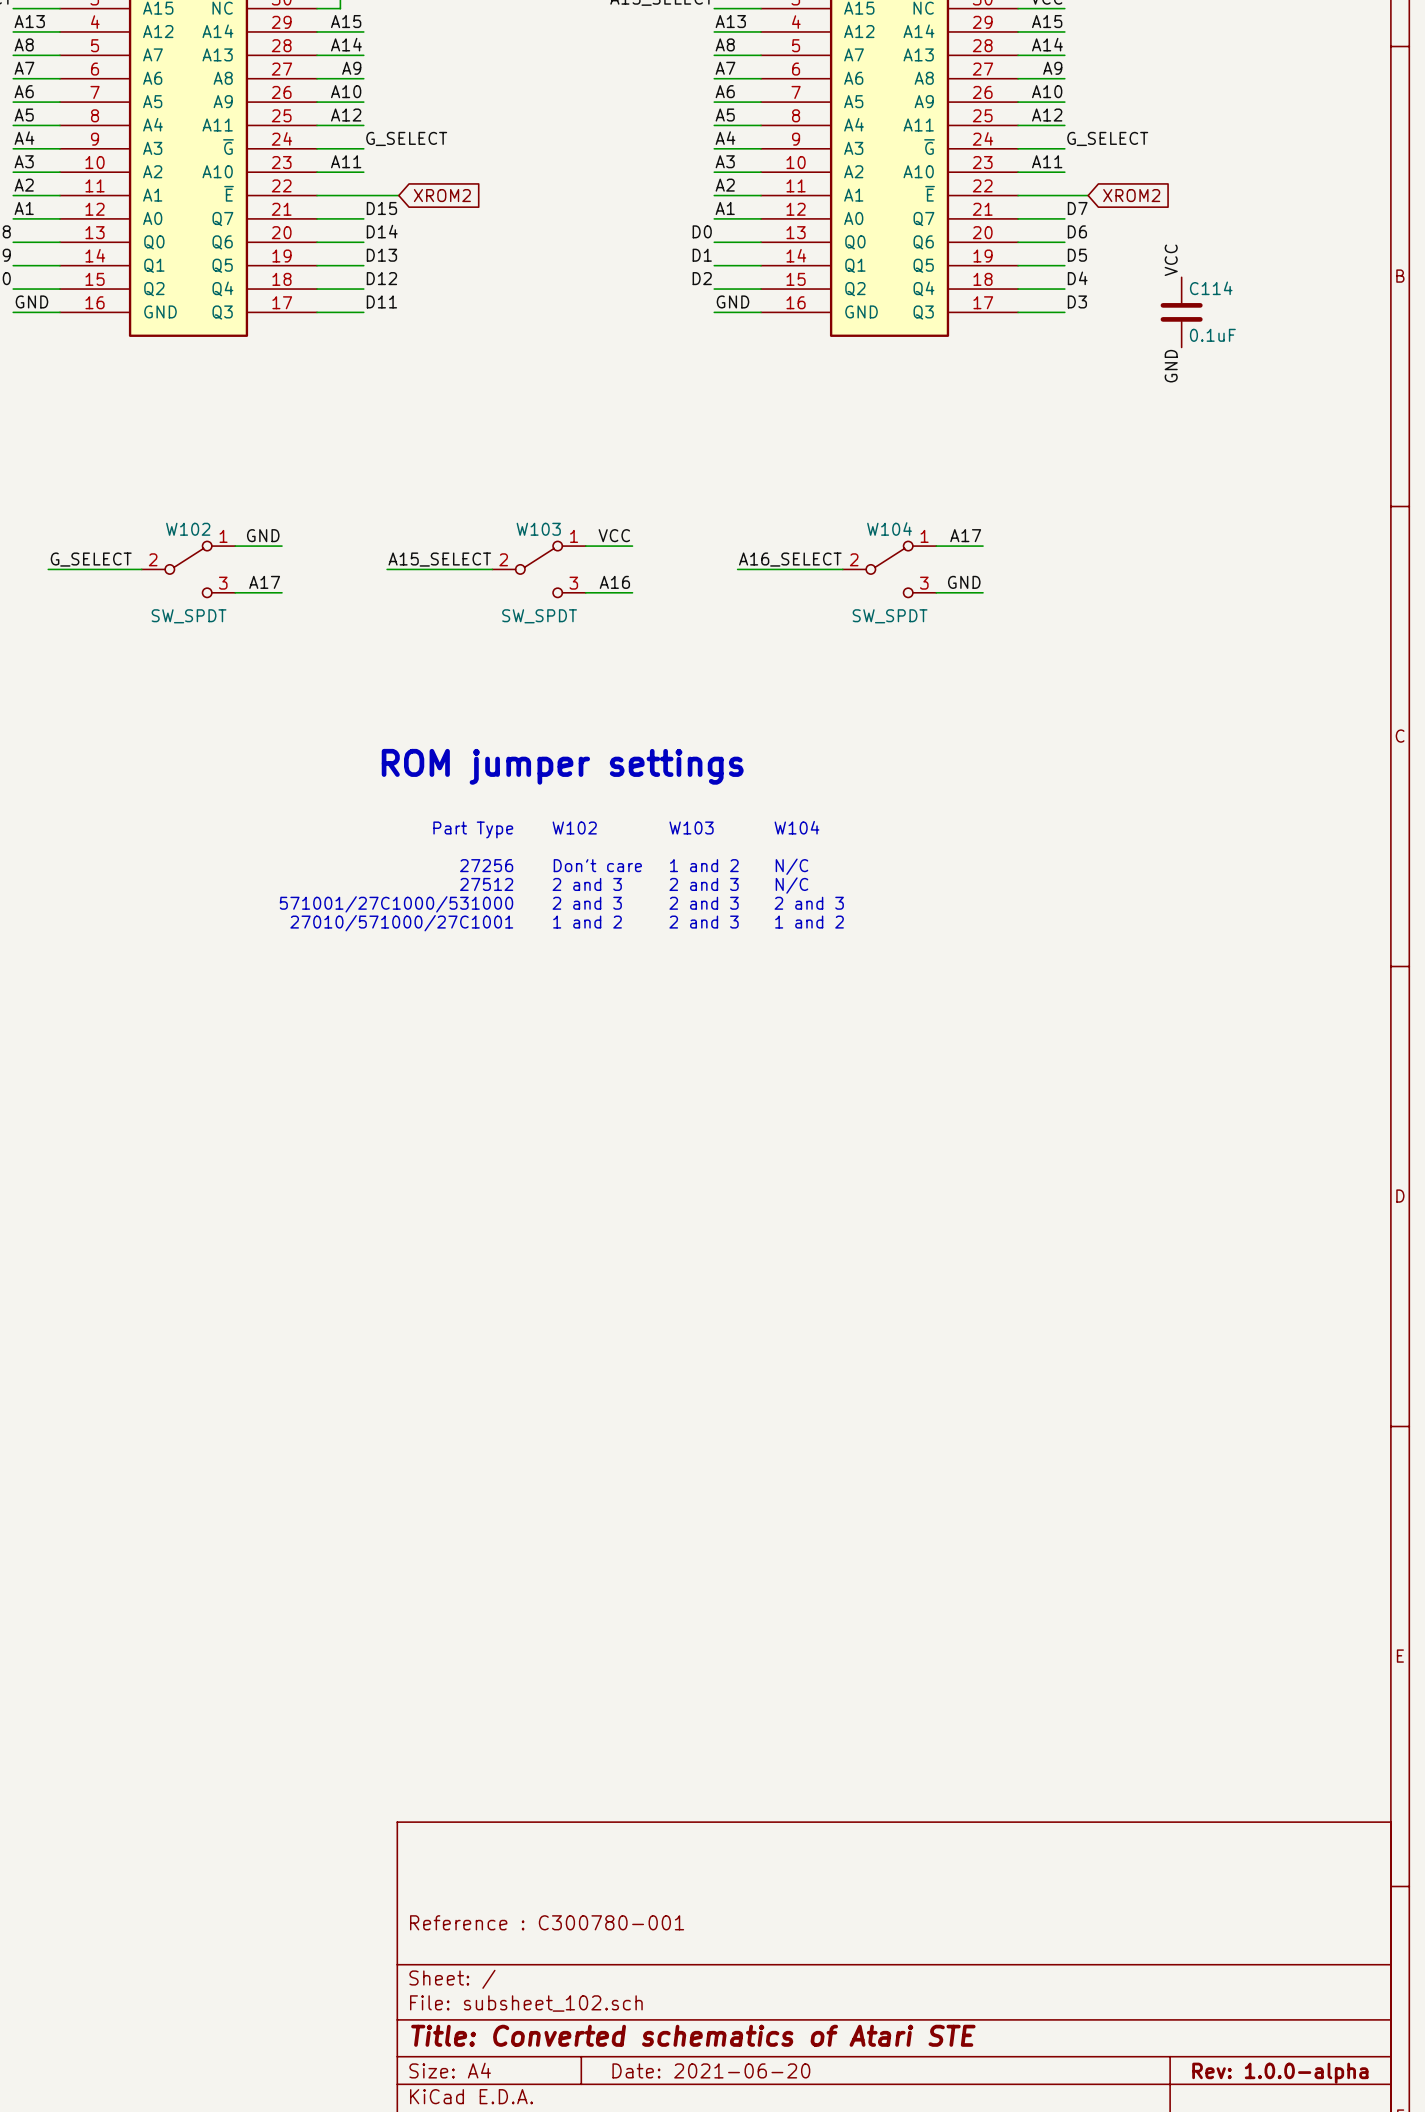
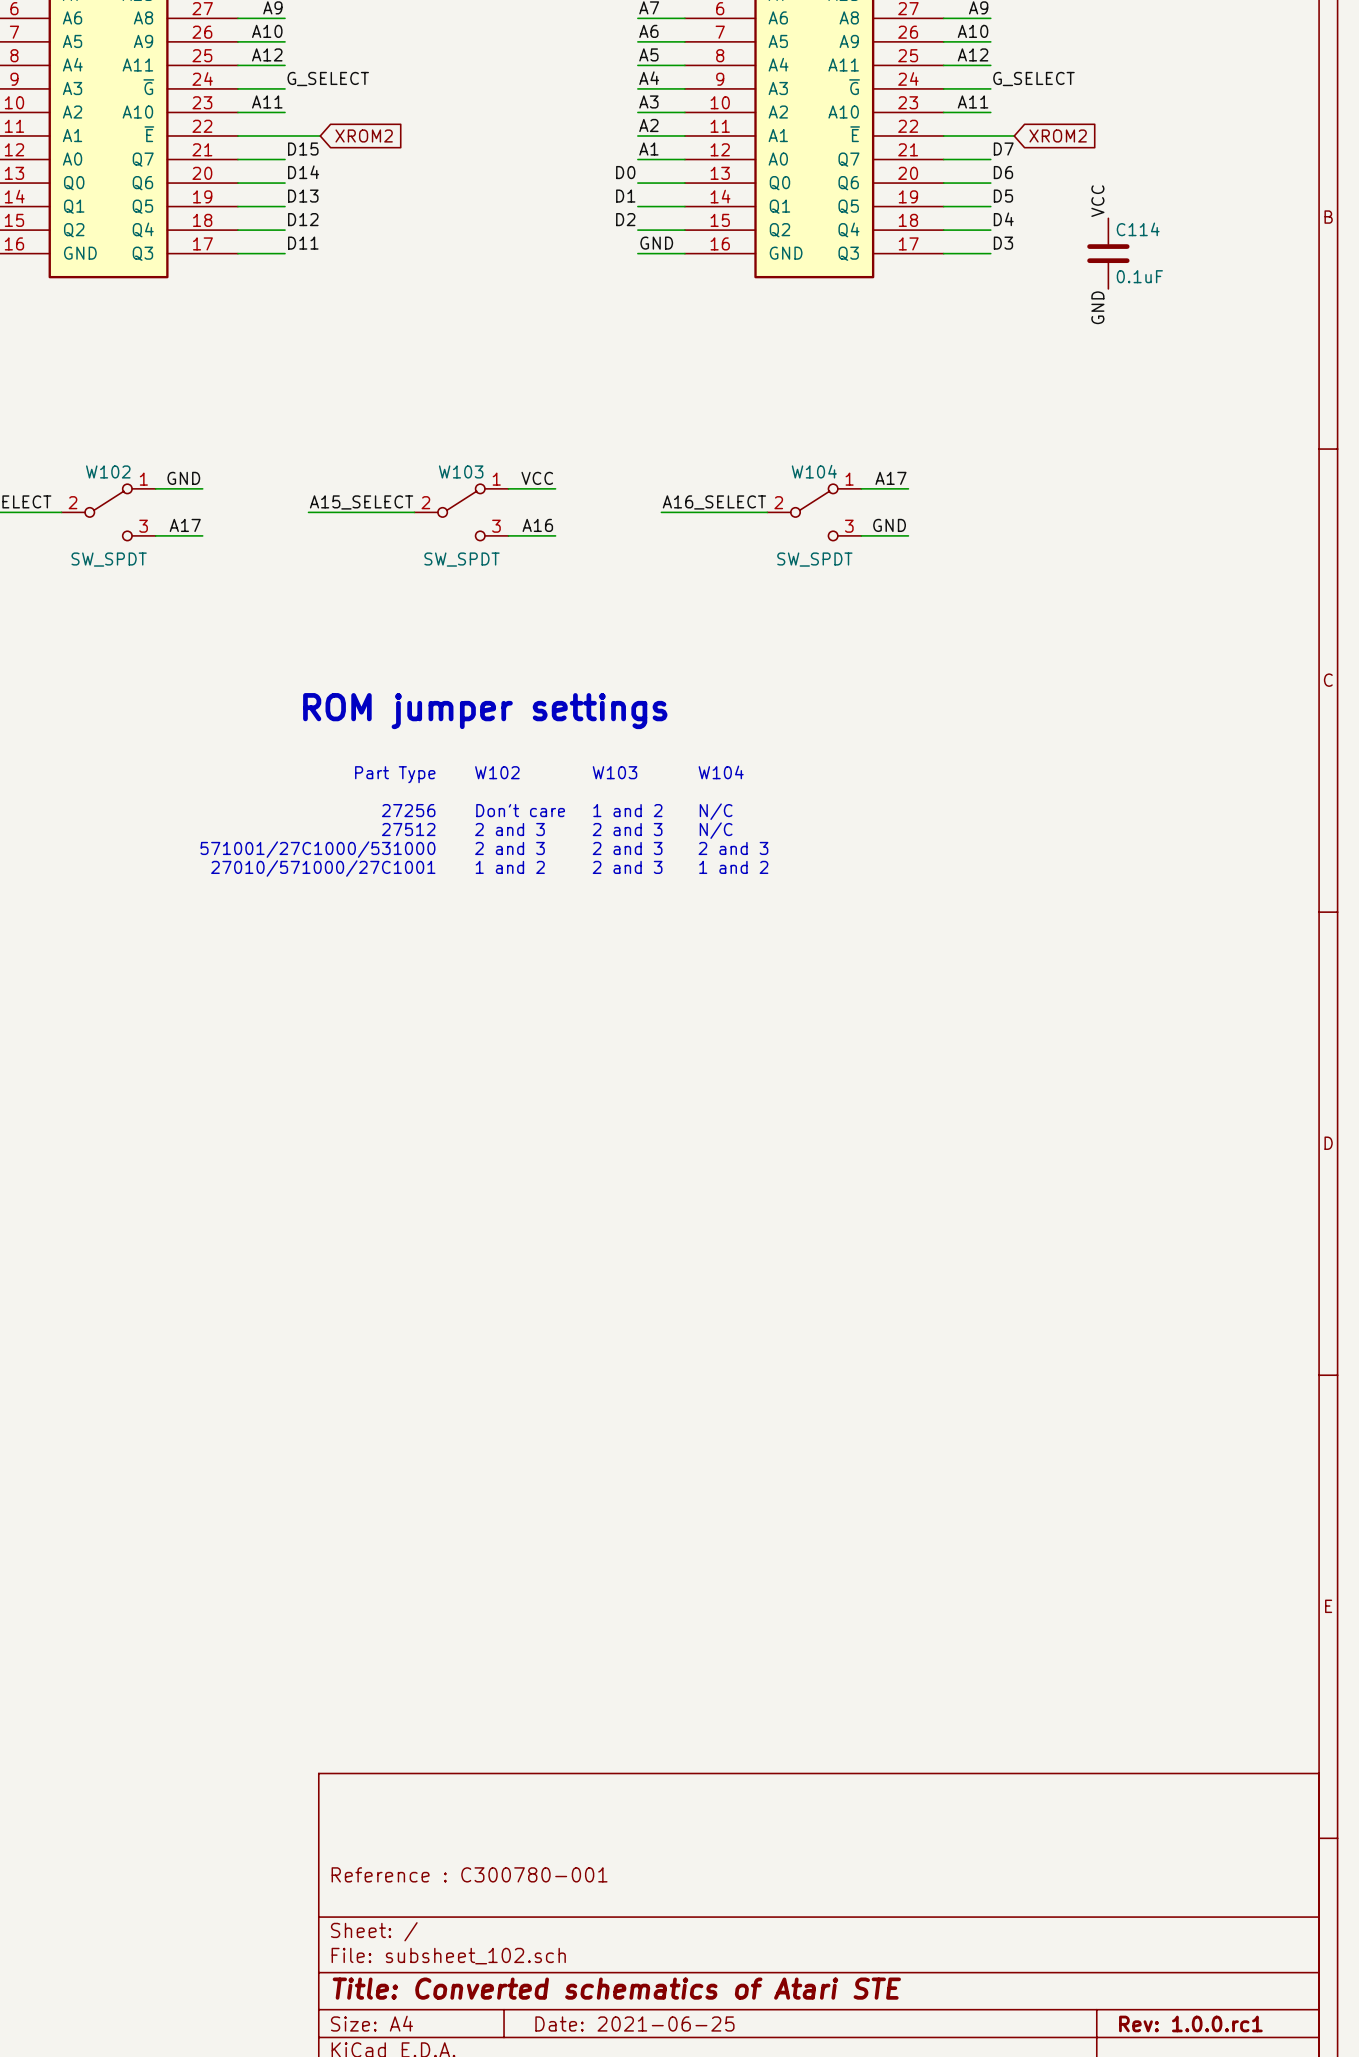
title block: Date: 2021-06-20 (711, 2070) -> Date: 2021-06-25 (634, 2023)
title block: Rev: 1.0.0-alpha (1280, 2073) -> Rev: 1.0.0.rc1 (1190, 2023)

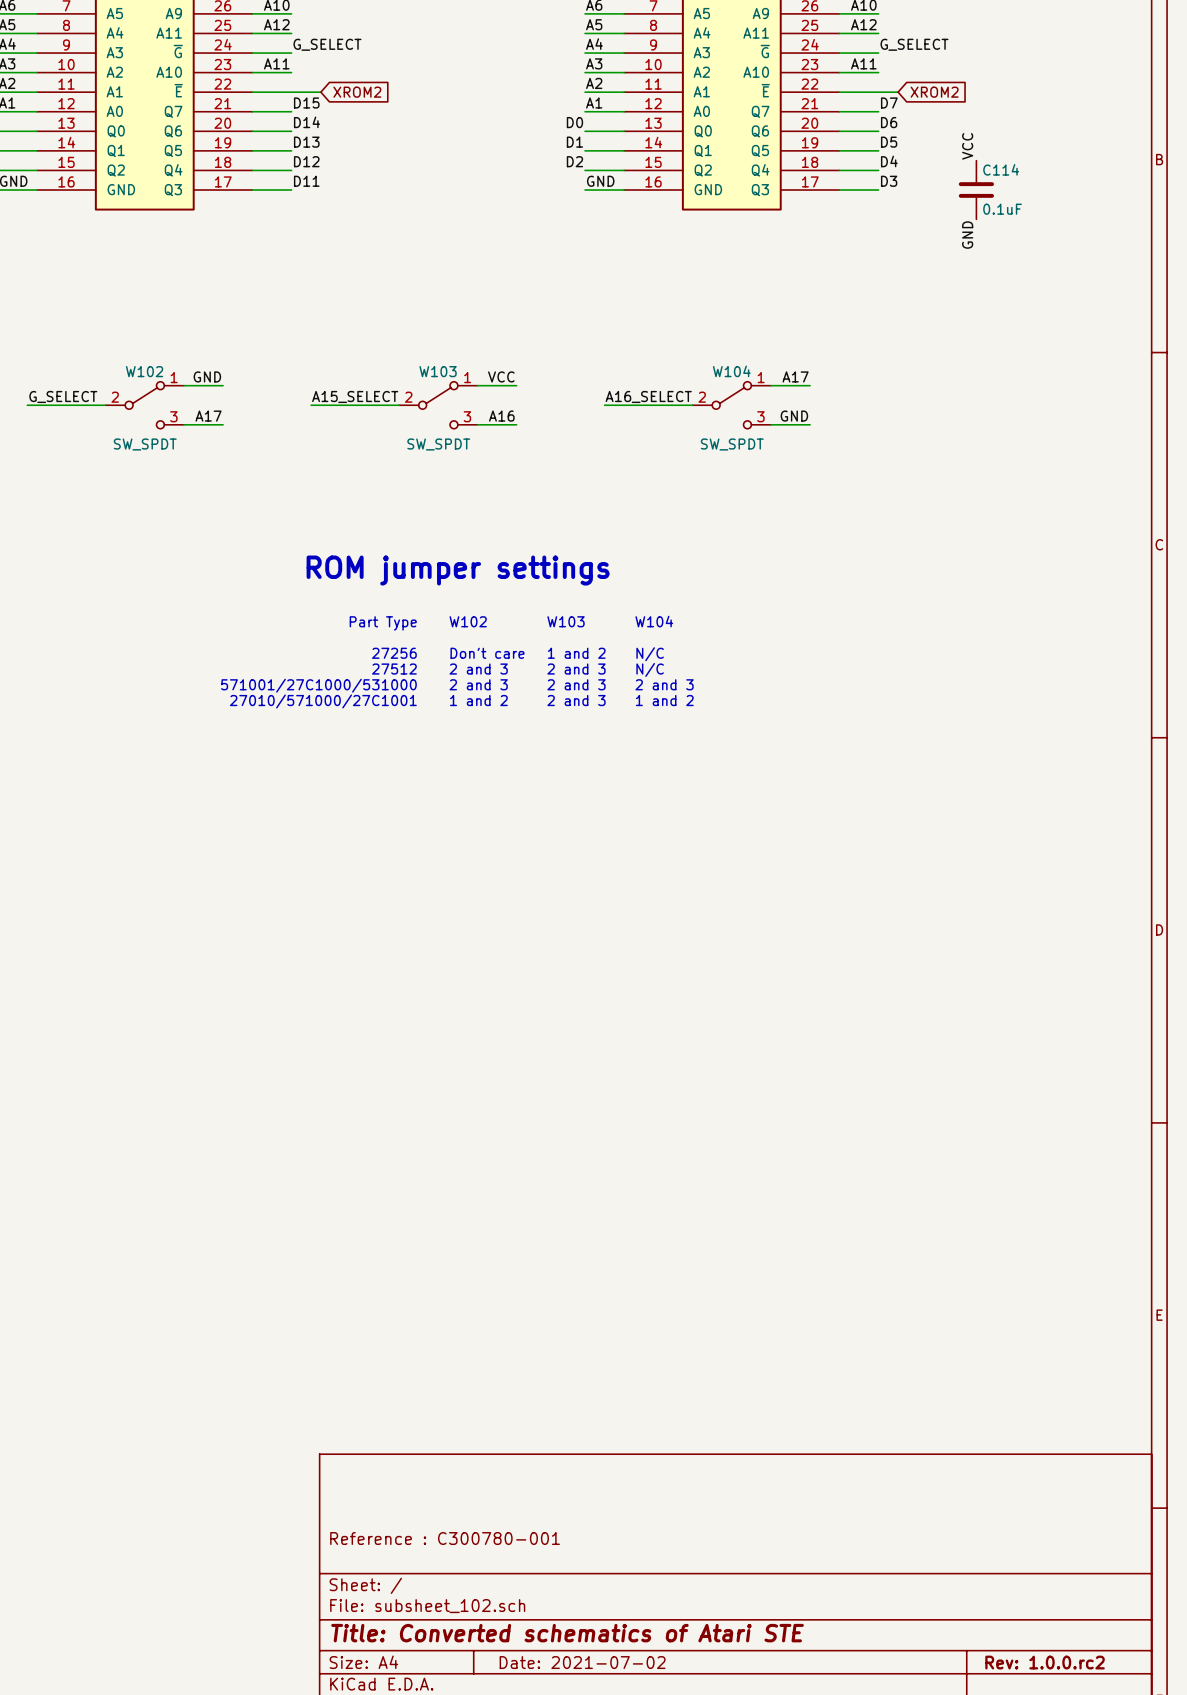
title block: Date: 2021-06-25 (634, 2023) -> Date: 2021-07-02 (582, 1662)
title block: Rev: 1.0.0.rc1 (1190, 2023) -> Rev: 1.0.0.rc2 (1045, 1662)

